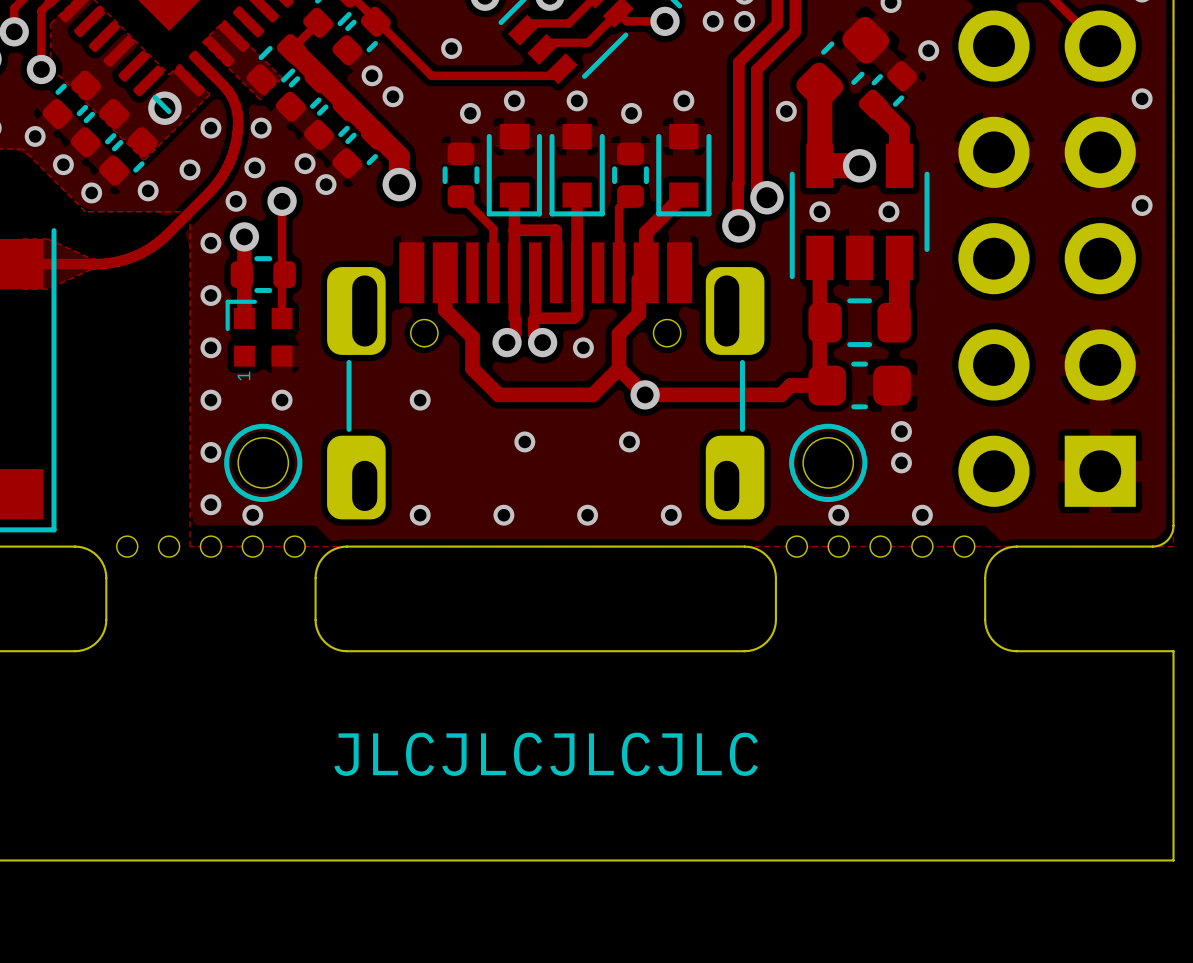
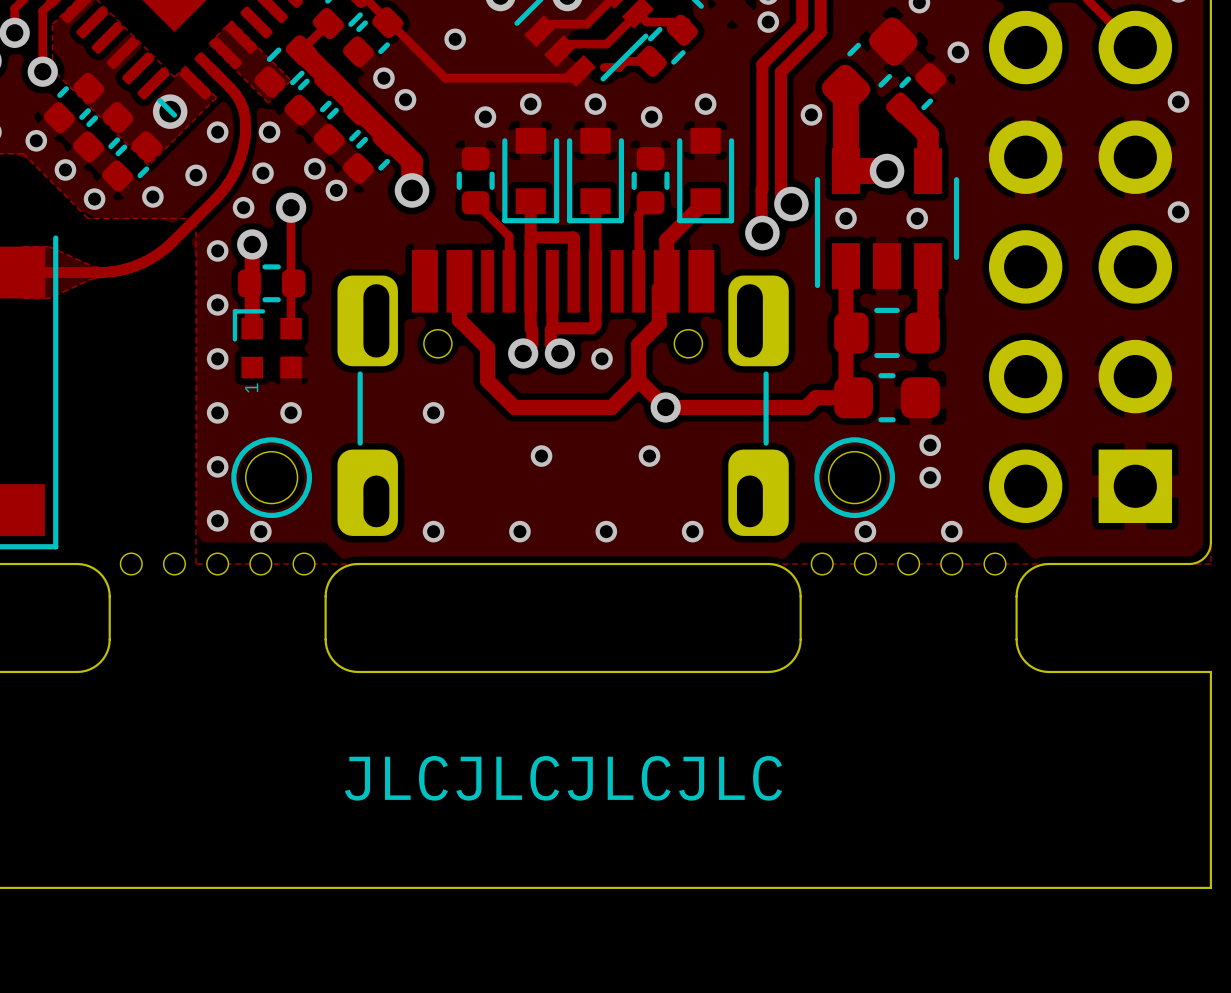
via: (665, 21) -> none
via: (713, 21) -> none
part: none -> (666, 45)
via position: (451, 48) -> (455, 39)
track: none -> (651, 61) (625, 61) (619, 67) (604, 67)

